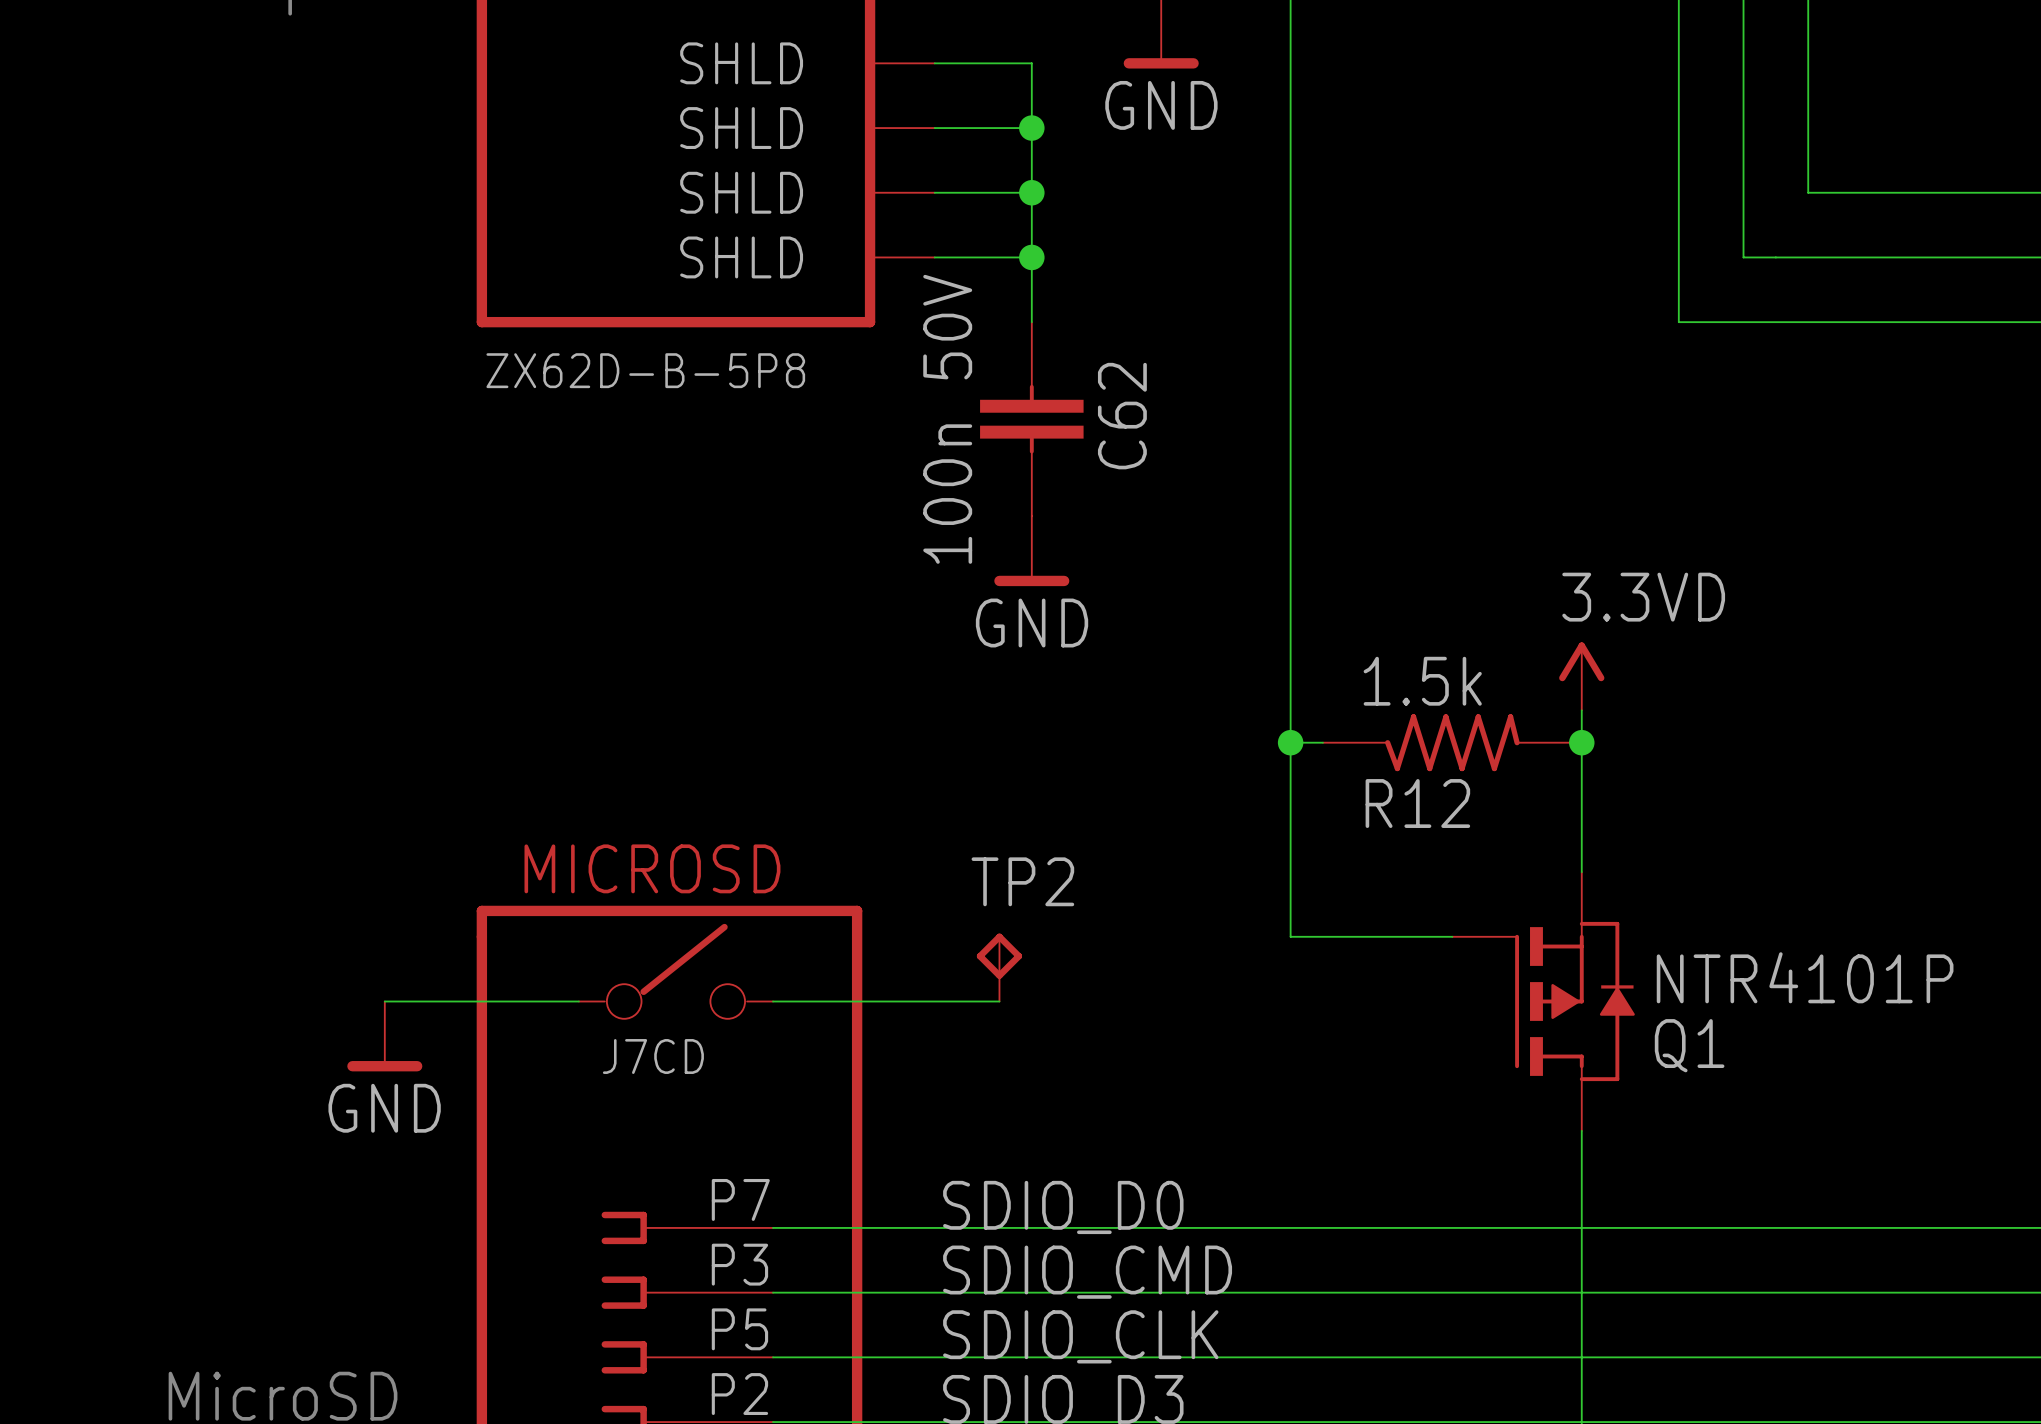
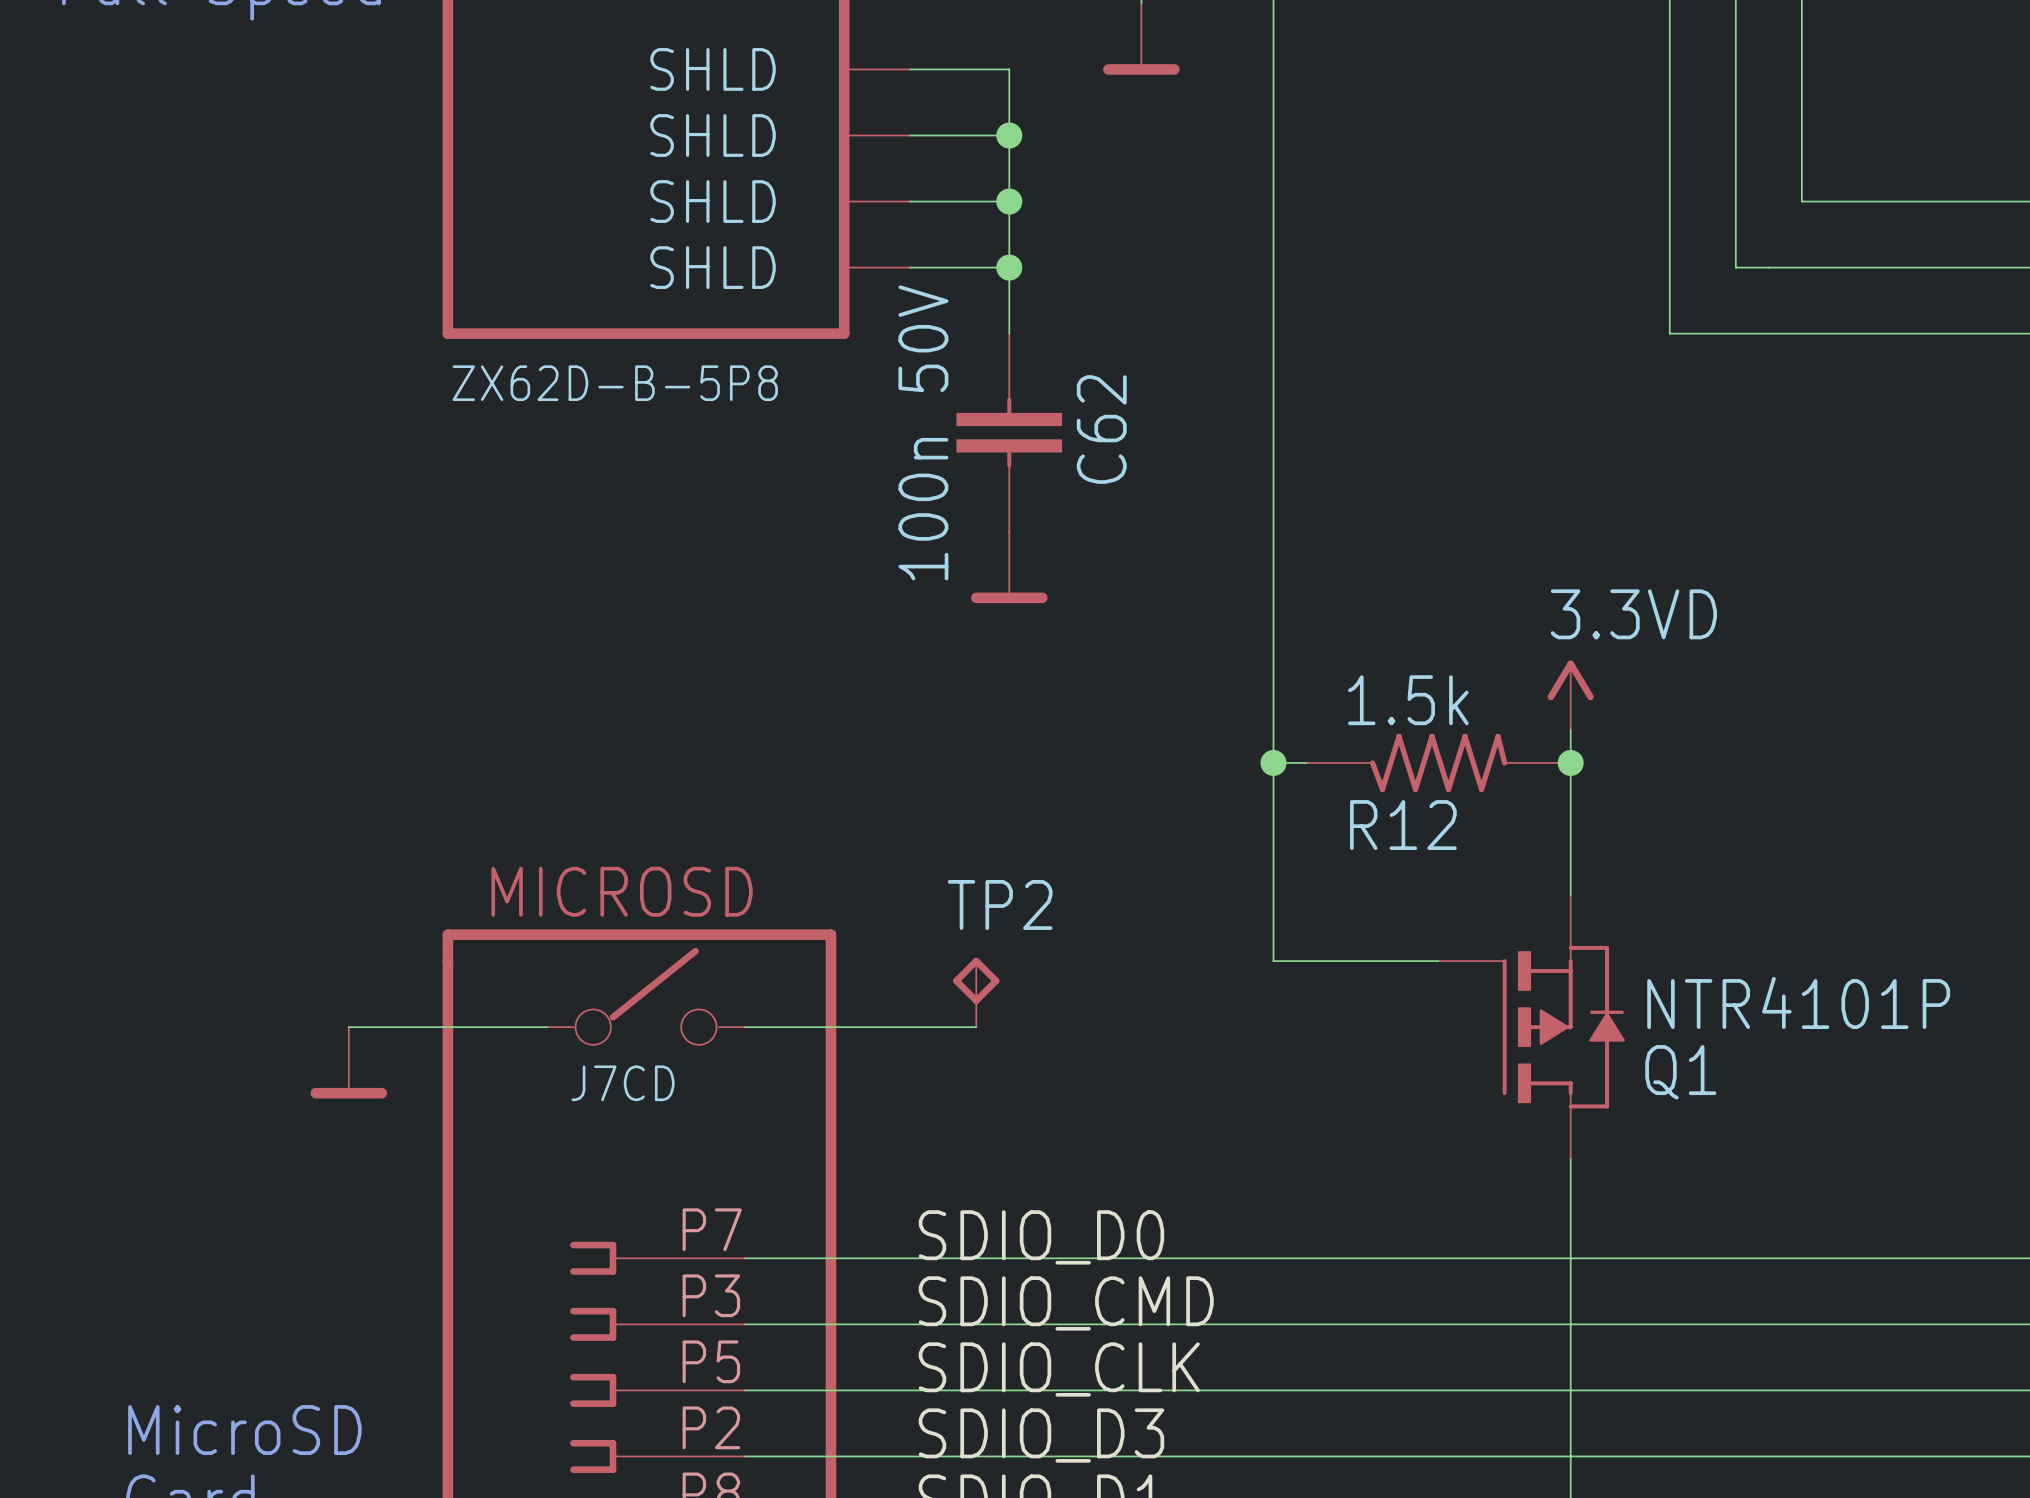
power symbol text: GND (1161, 105) -> none
power symbol text: GND (1032, 623) -> none
power symbol text: GND (384, 1108) -> none

